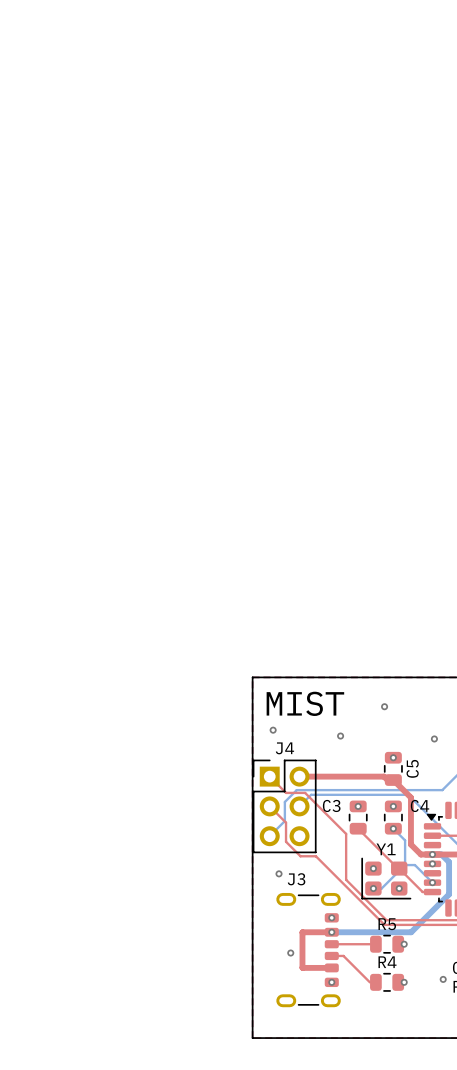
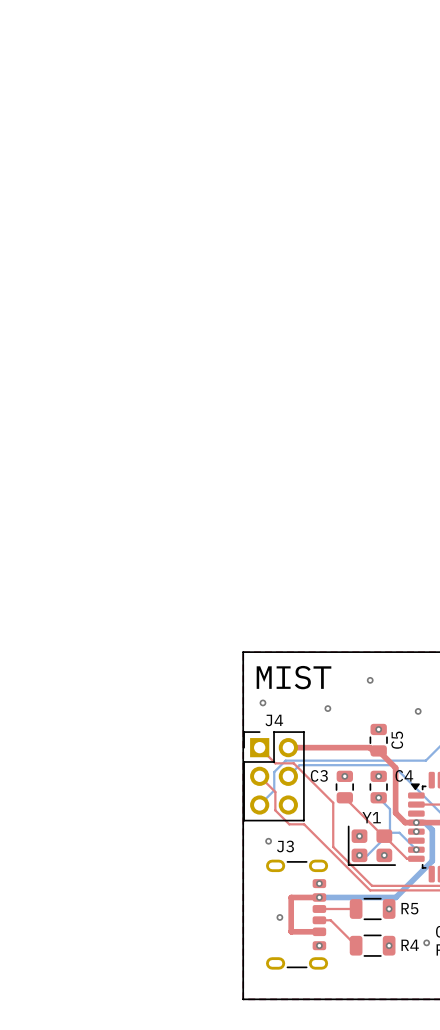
R5 name position: R5 (387, 924) -> R5 (409, 908)
R5 footprint: [370, 934, 405, 954] -> [349, 898, 396, 920]
R4 name position: R4 (387, 962) -> R4 (410, 945)
R4 footprint: [370, 973, 405, 992] -> [349, 934, 396, 957]

